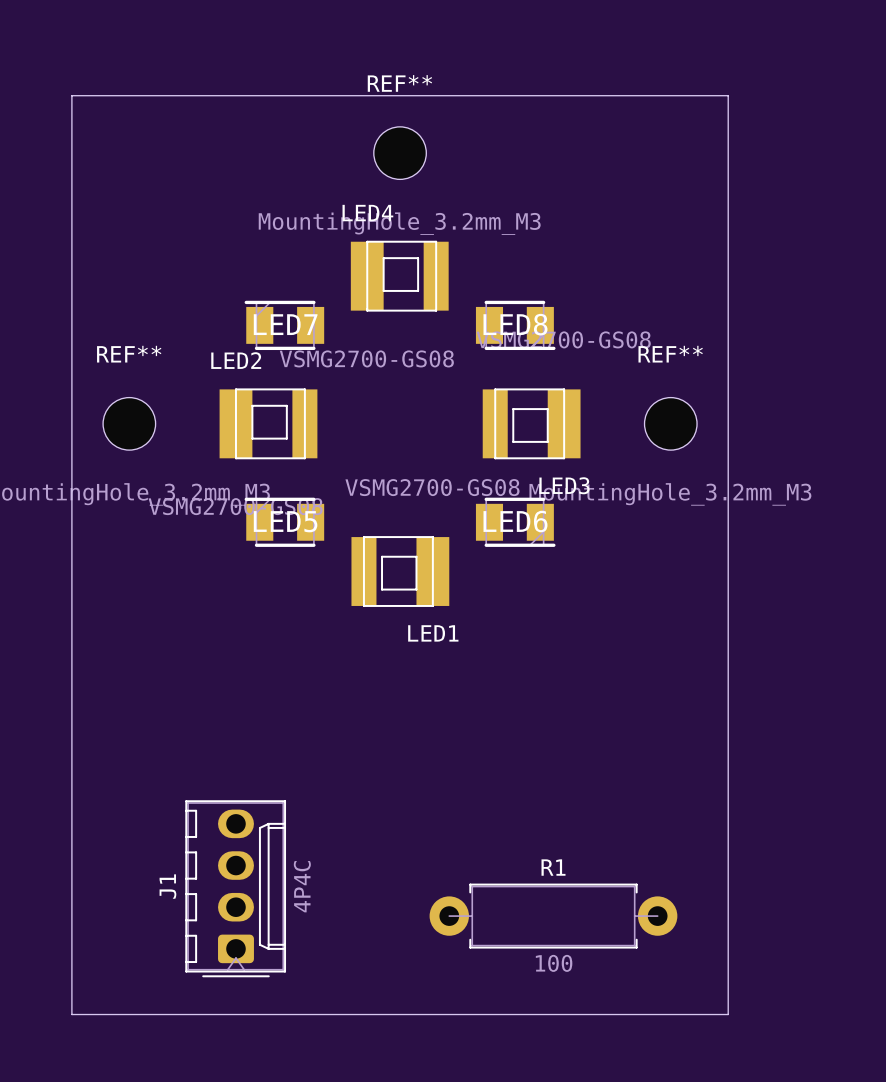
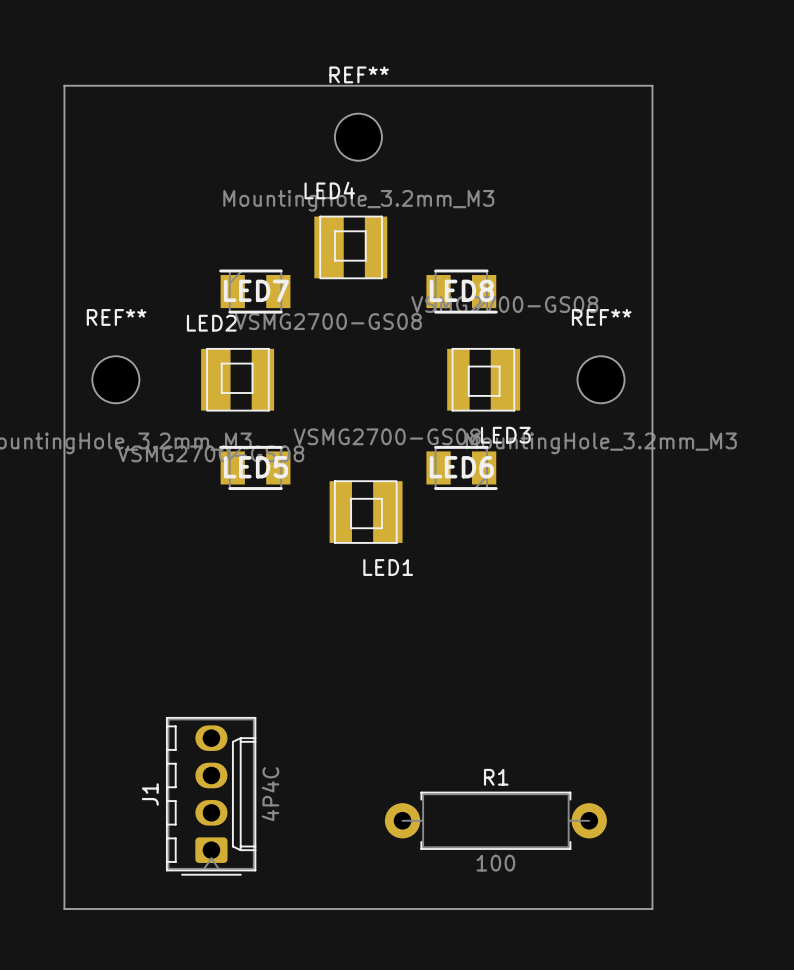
LED4 footprint: [350, 240, 449, 312] -> [314, 215, 388, 280]
LED2 footprint: [219, 388, 318, 460] -> [201, 348, 275, 412]
LED3 footprint: [482, 388, 581, 460] -> [447, 348, 521, 412]
LED1 footprint: [351, 536, 450, 607] -> [329, 480, 403, 544]

